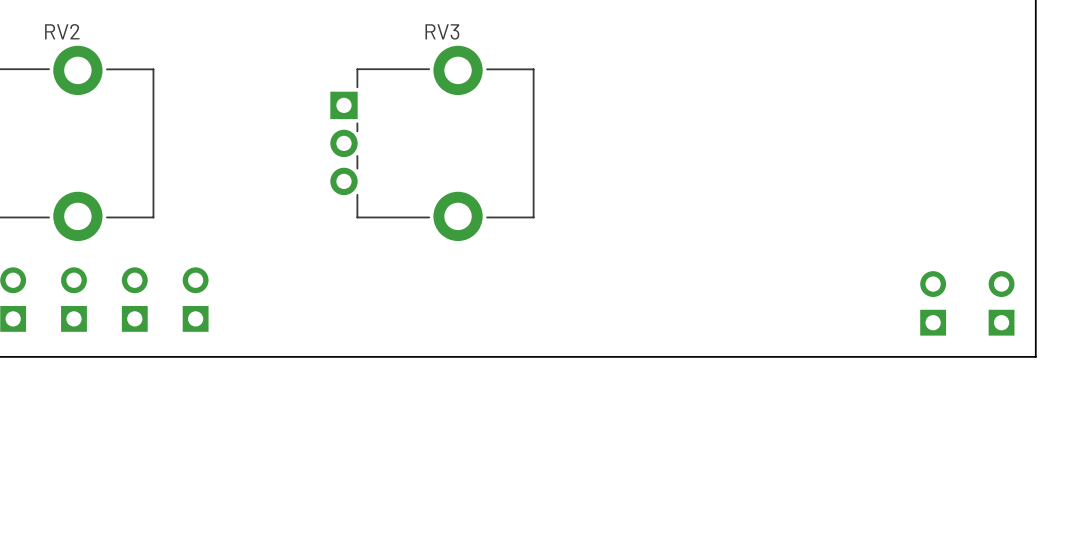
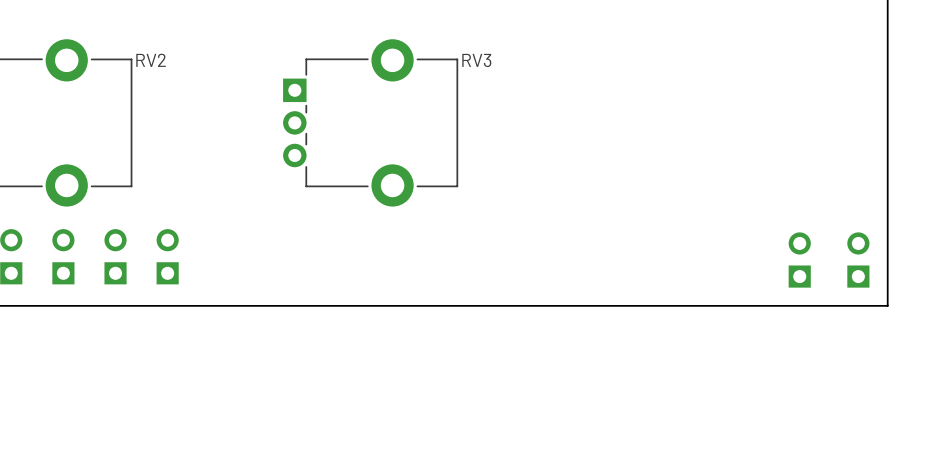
RV2 name position: RV2 (62, 31) -> RV2 (151, 60)
RV3 name position: RV3 (442, 31) -> RV3 (476, 60)

